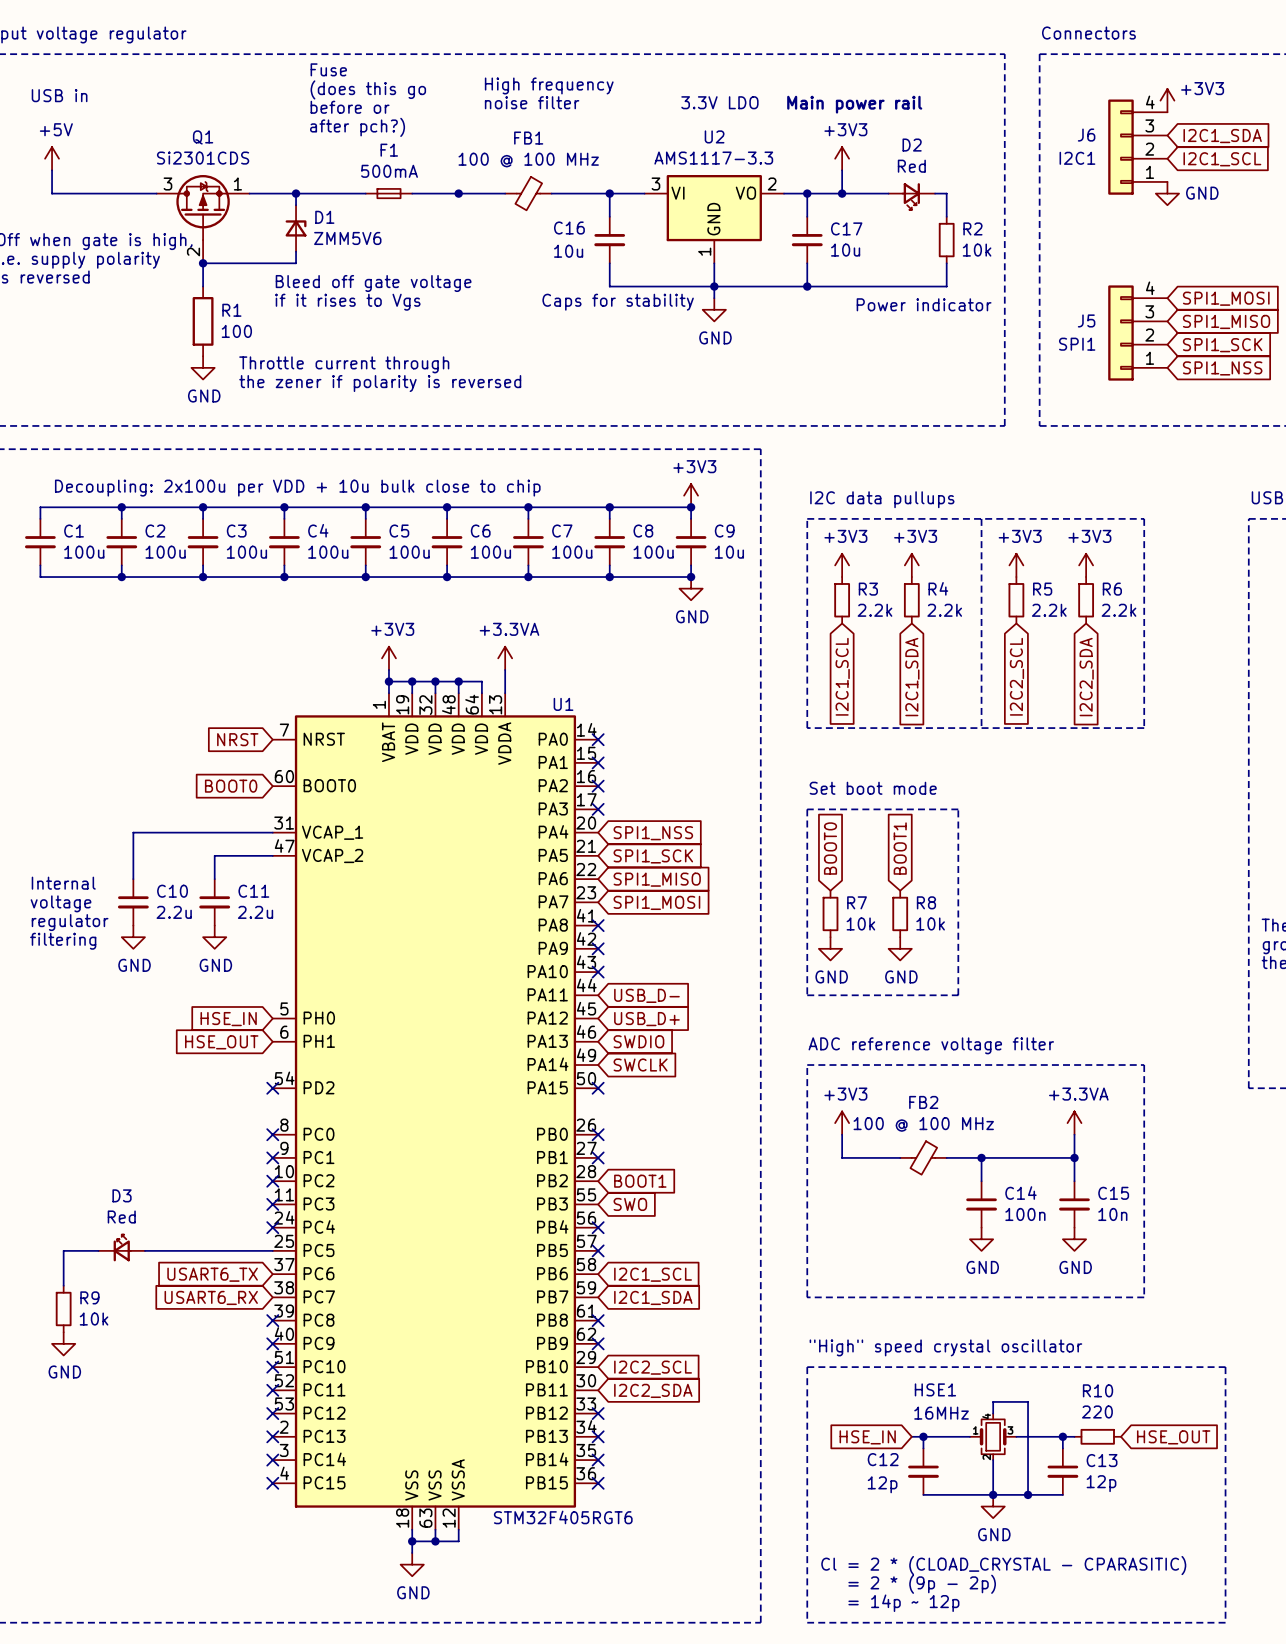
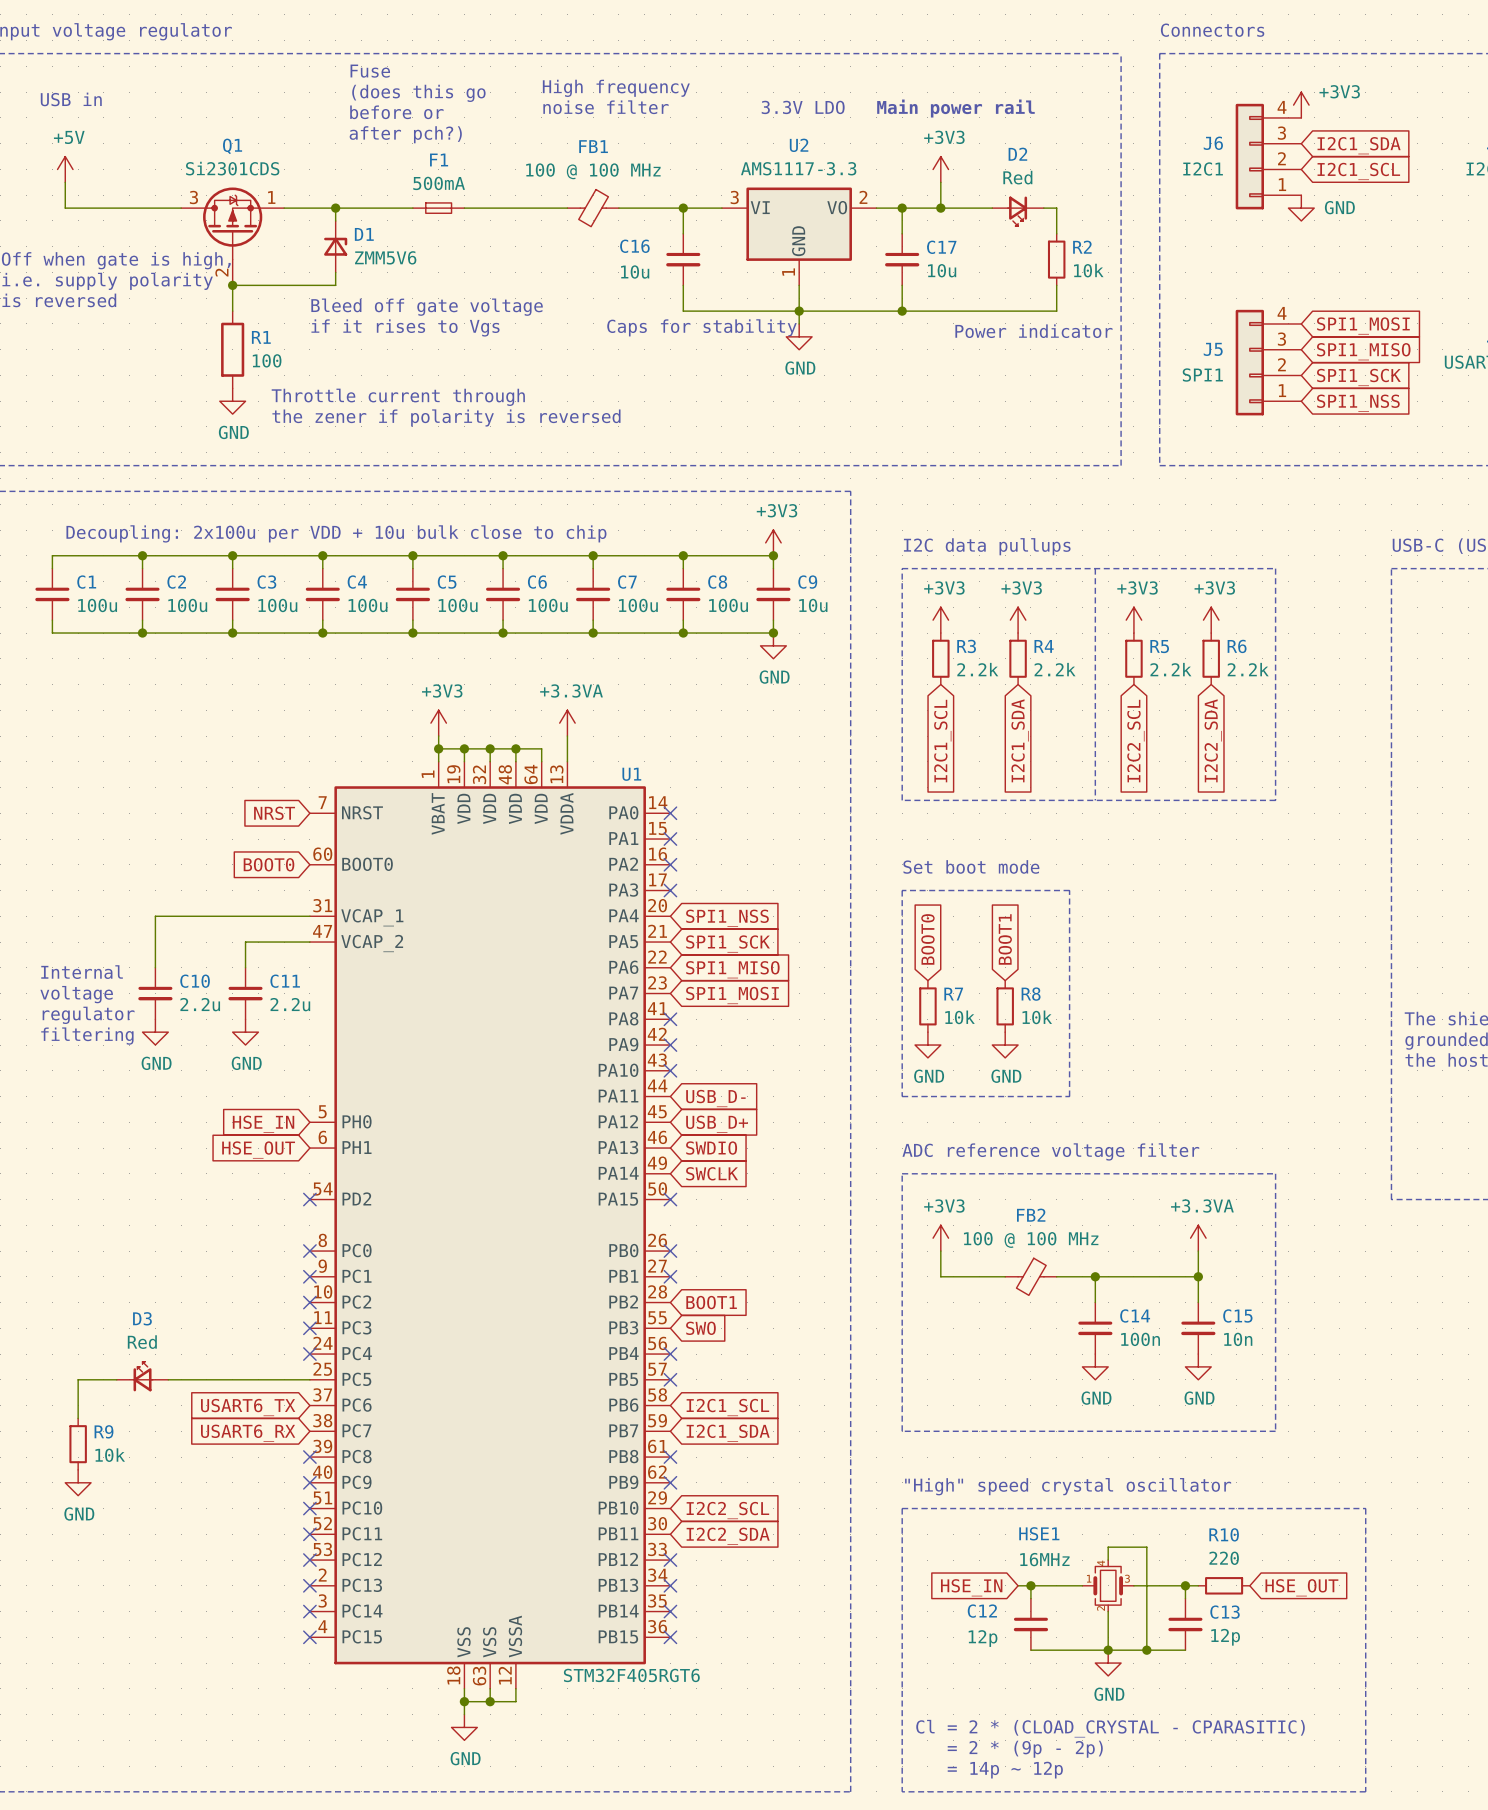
junction: (458, 193) -> none

